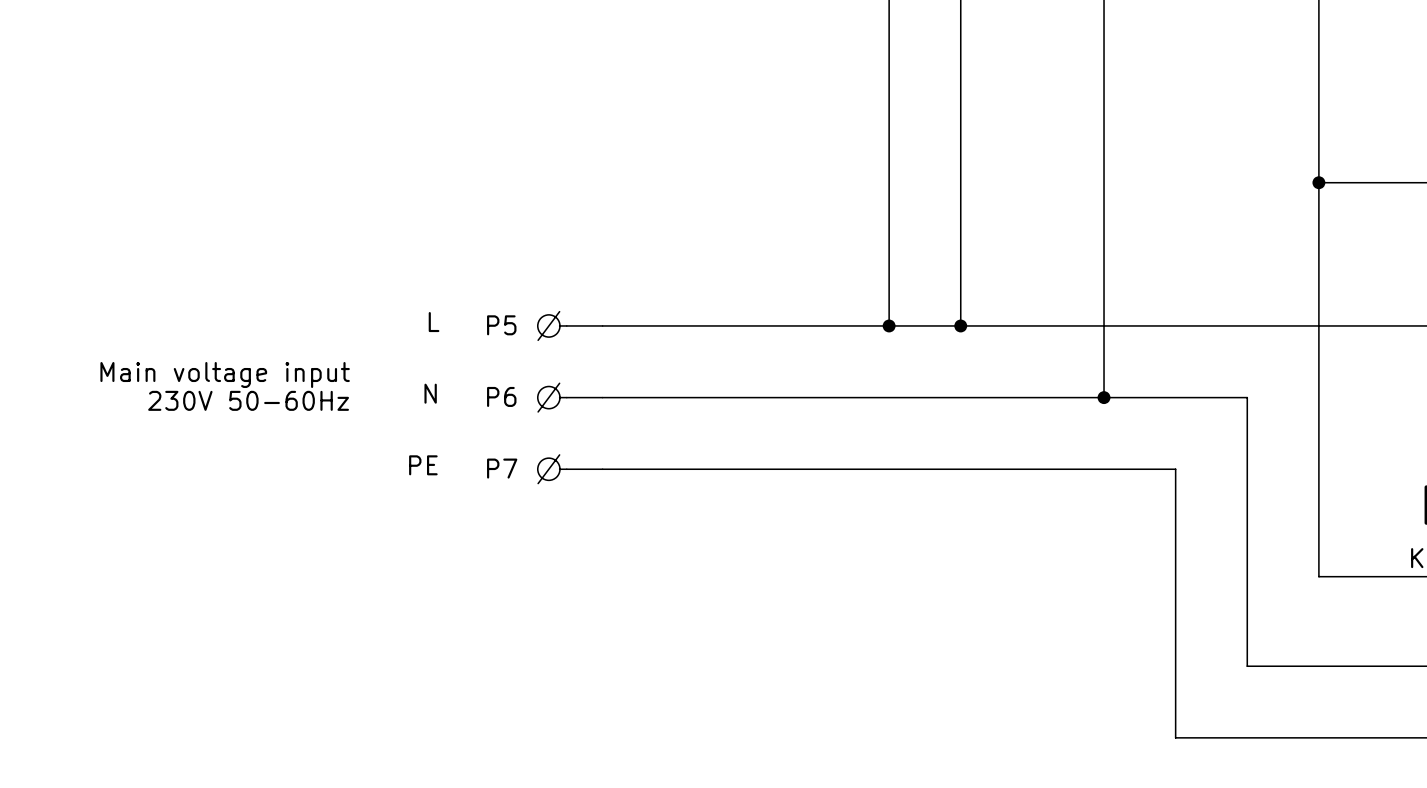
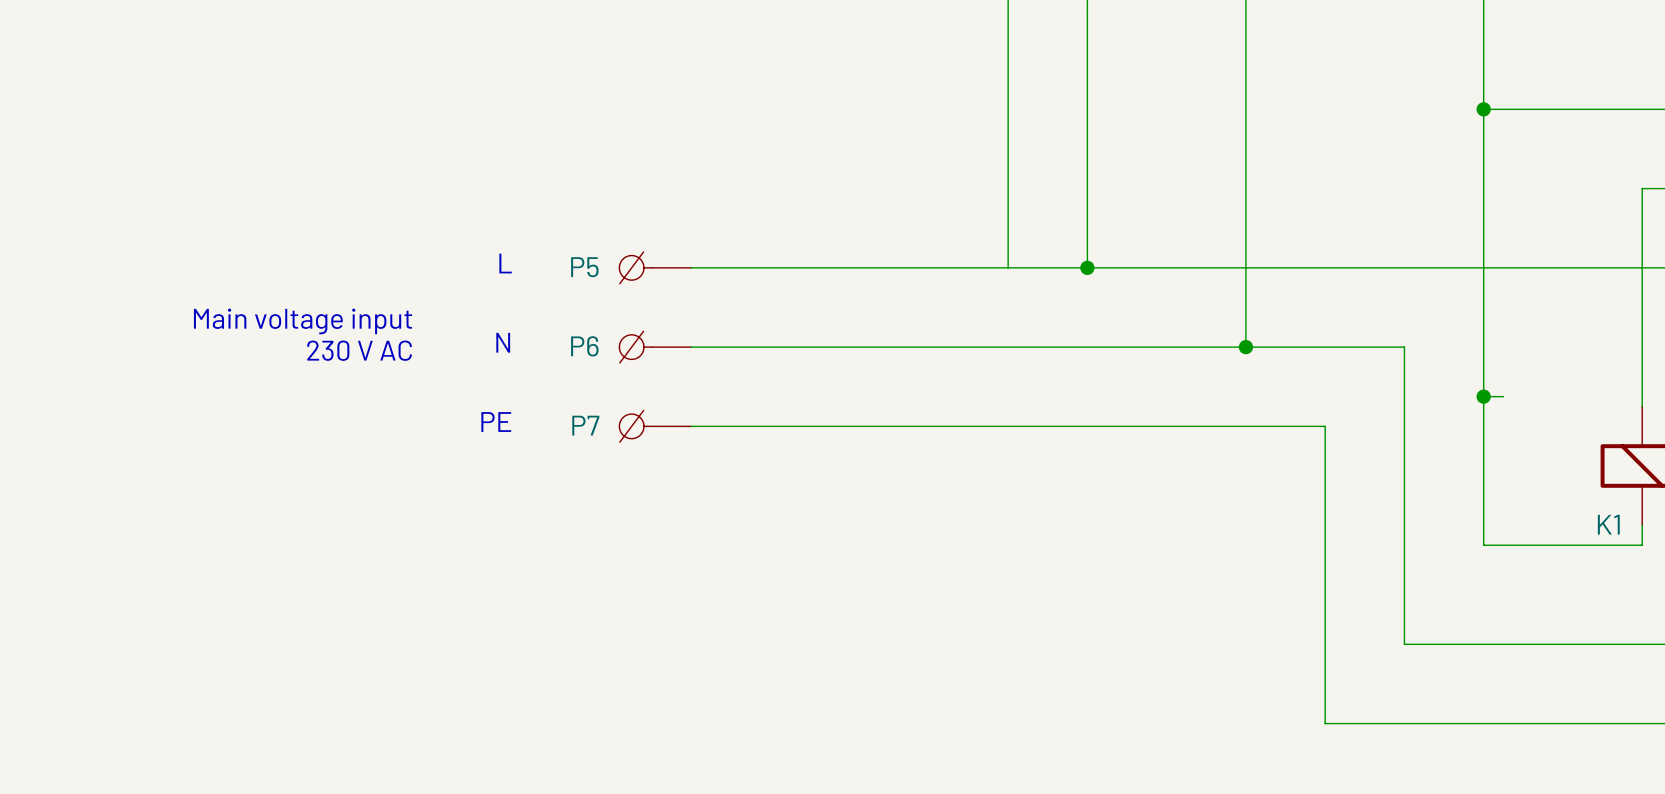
junction: (889, 325) -> none
text: 230V 50-60Hz (248, 400) -> 230 V AC (359, 350)
wire: none -> (1483, 396) (1503, 396)
junction: none -> (1483, 396)

